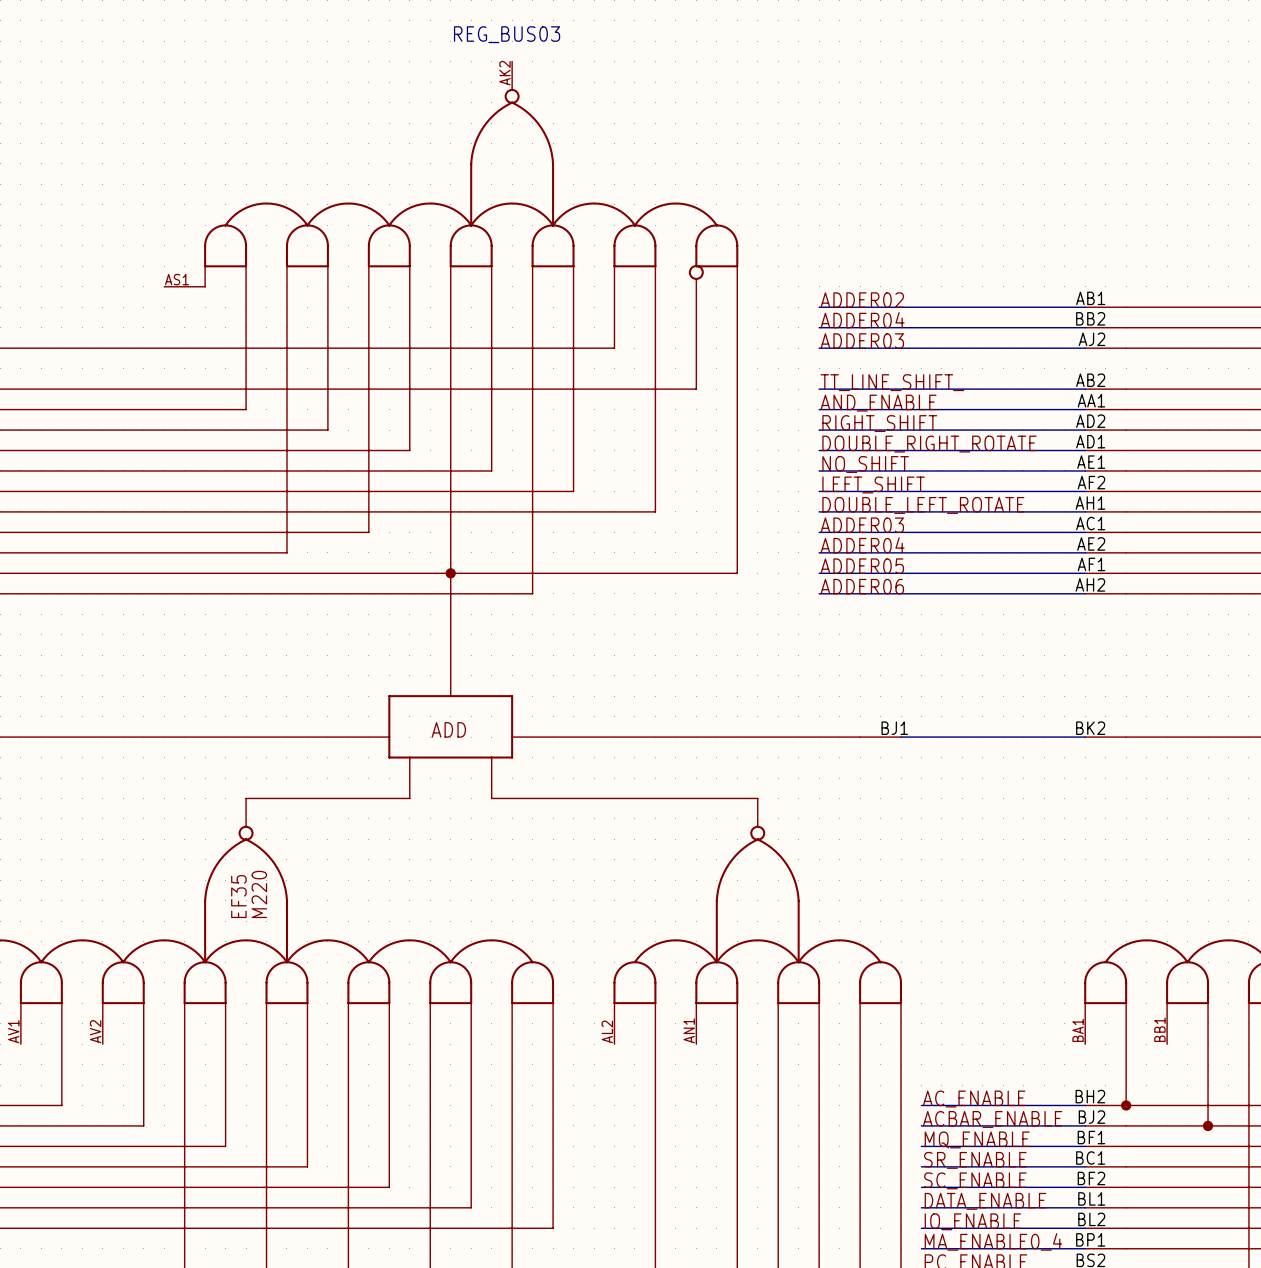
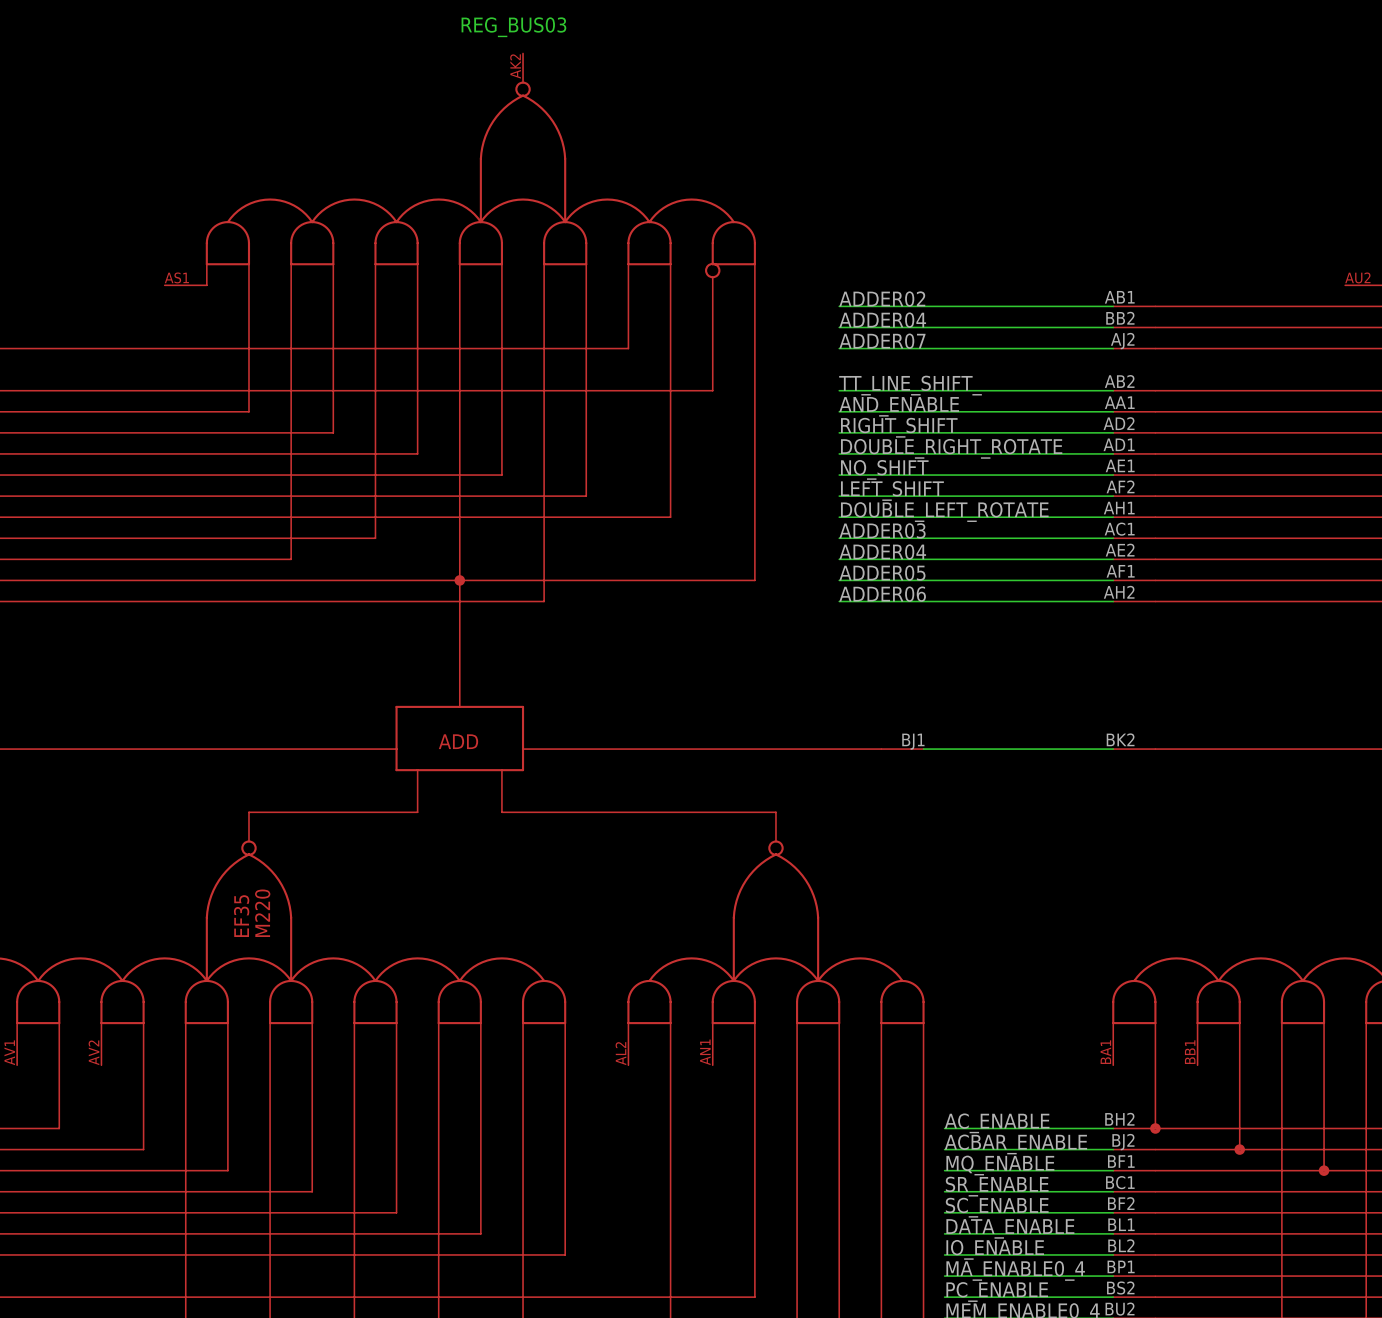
label: ADDER03 (862, 341) -> ADDER07 (882, 341)

